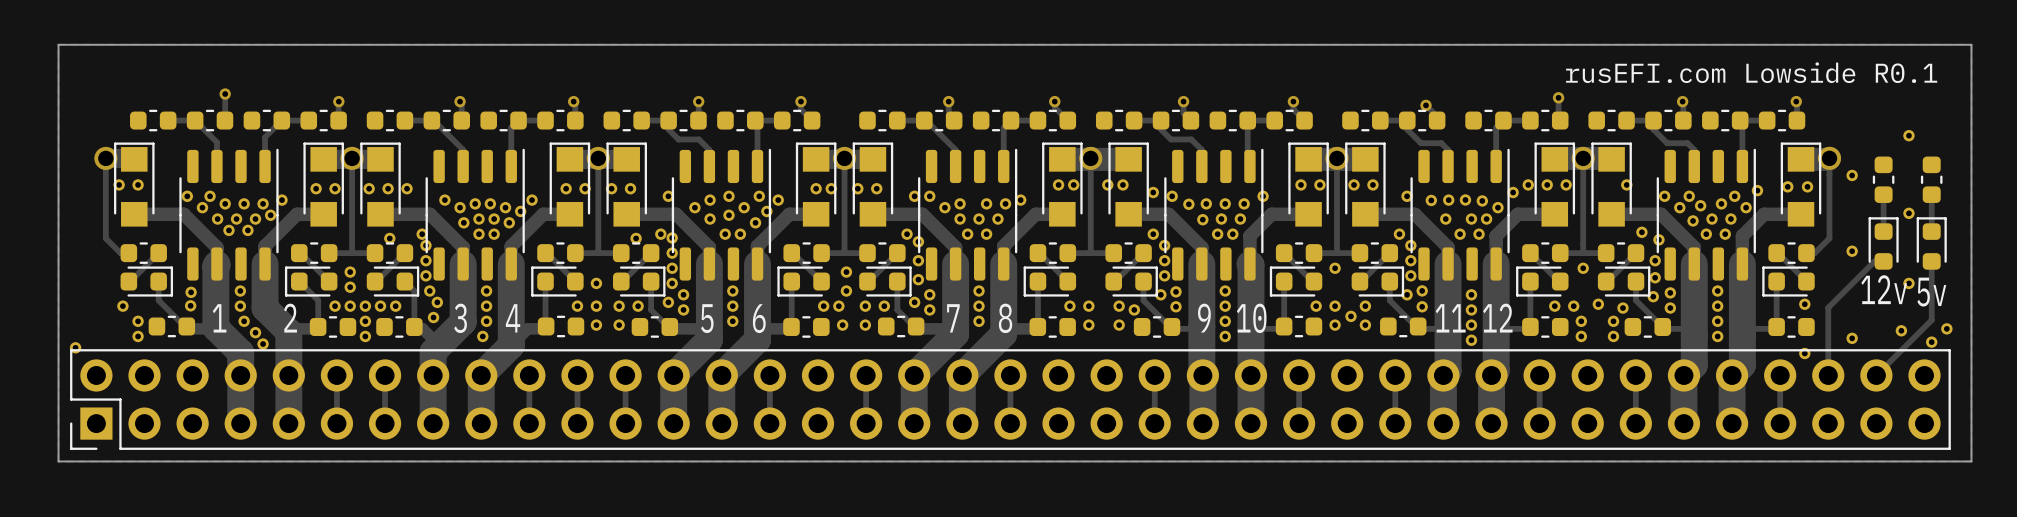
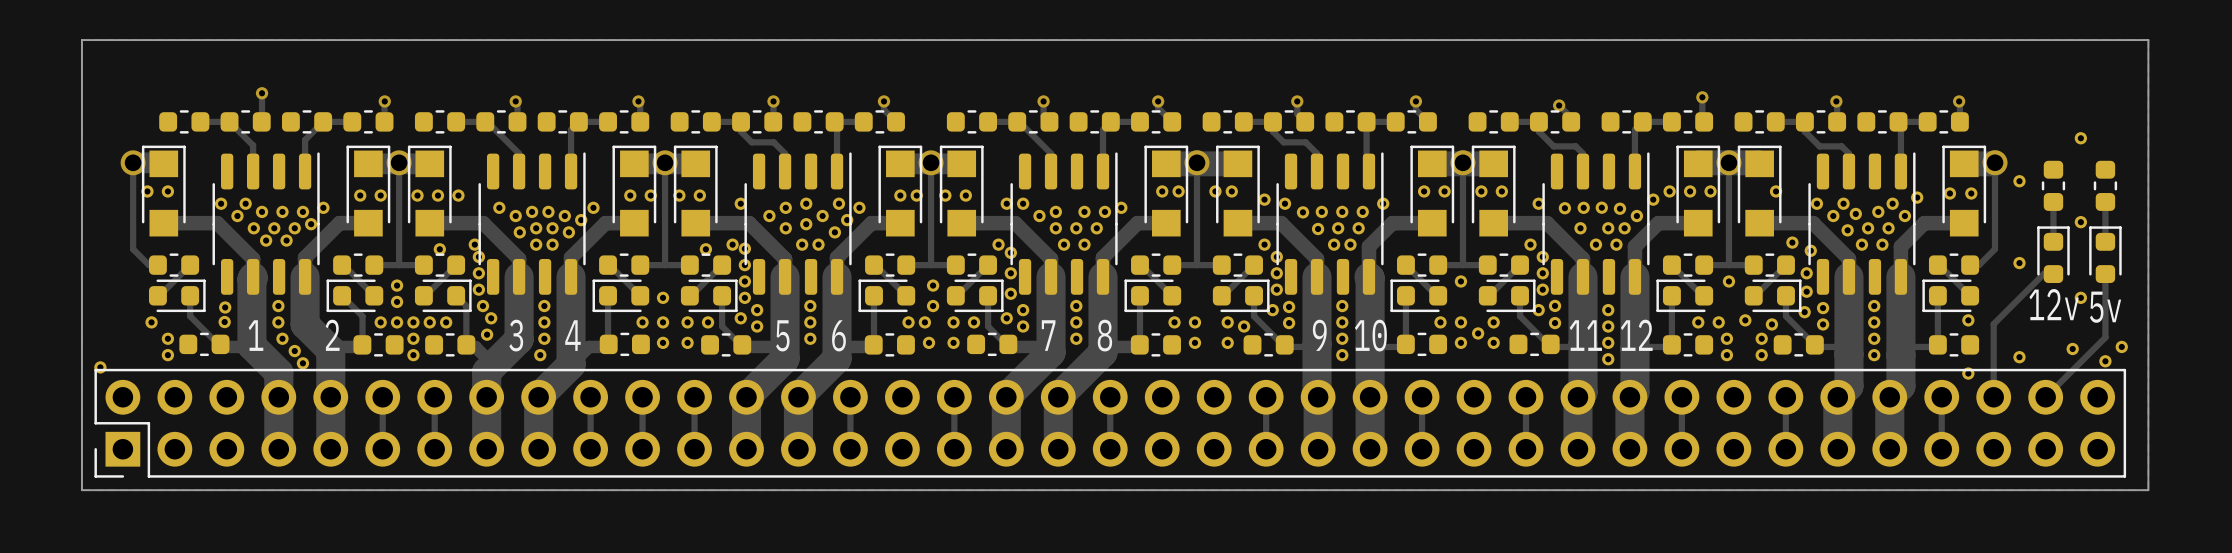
text: rusEFI.com Lowside R0.1 (1751, 72) -> none

